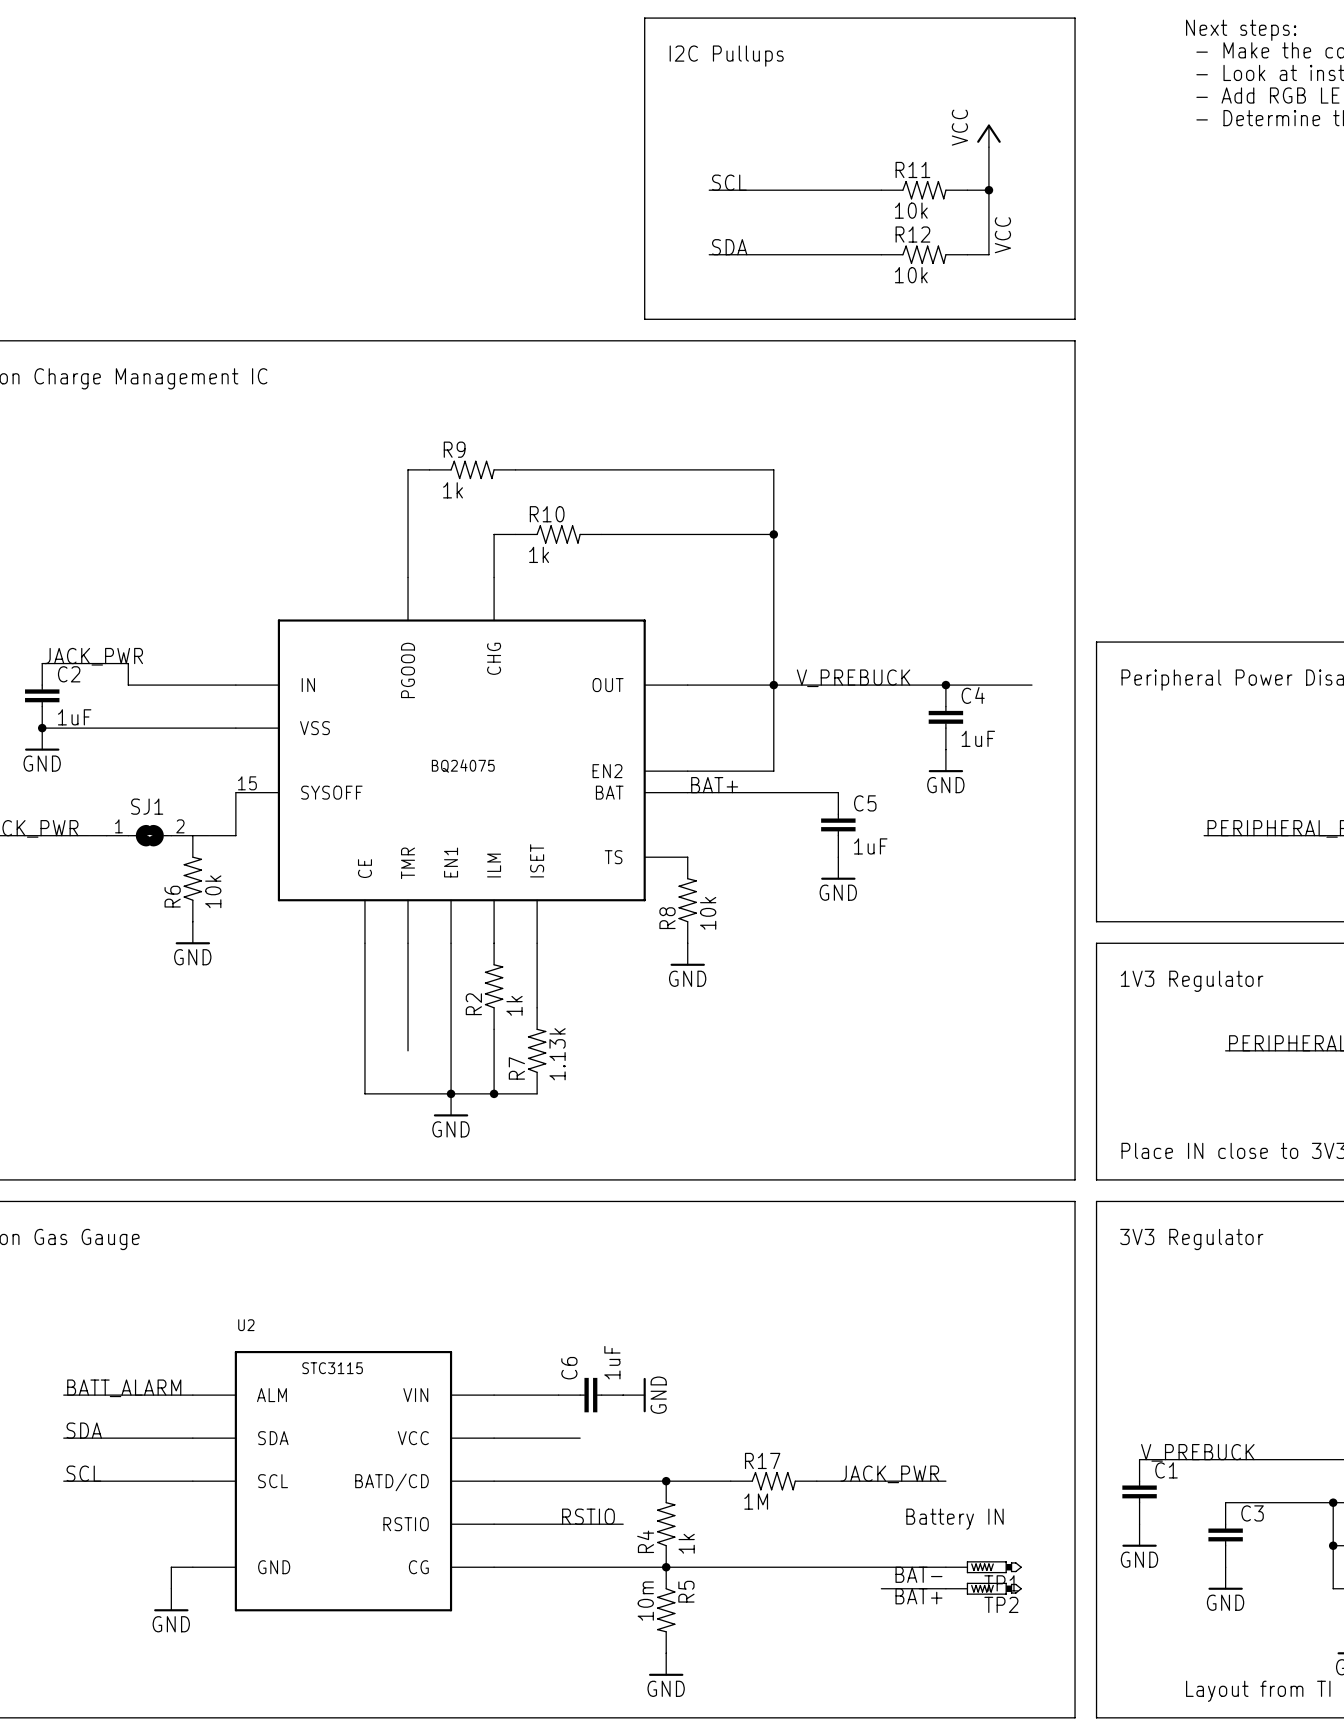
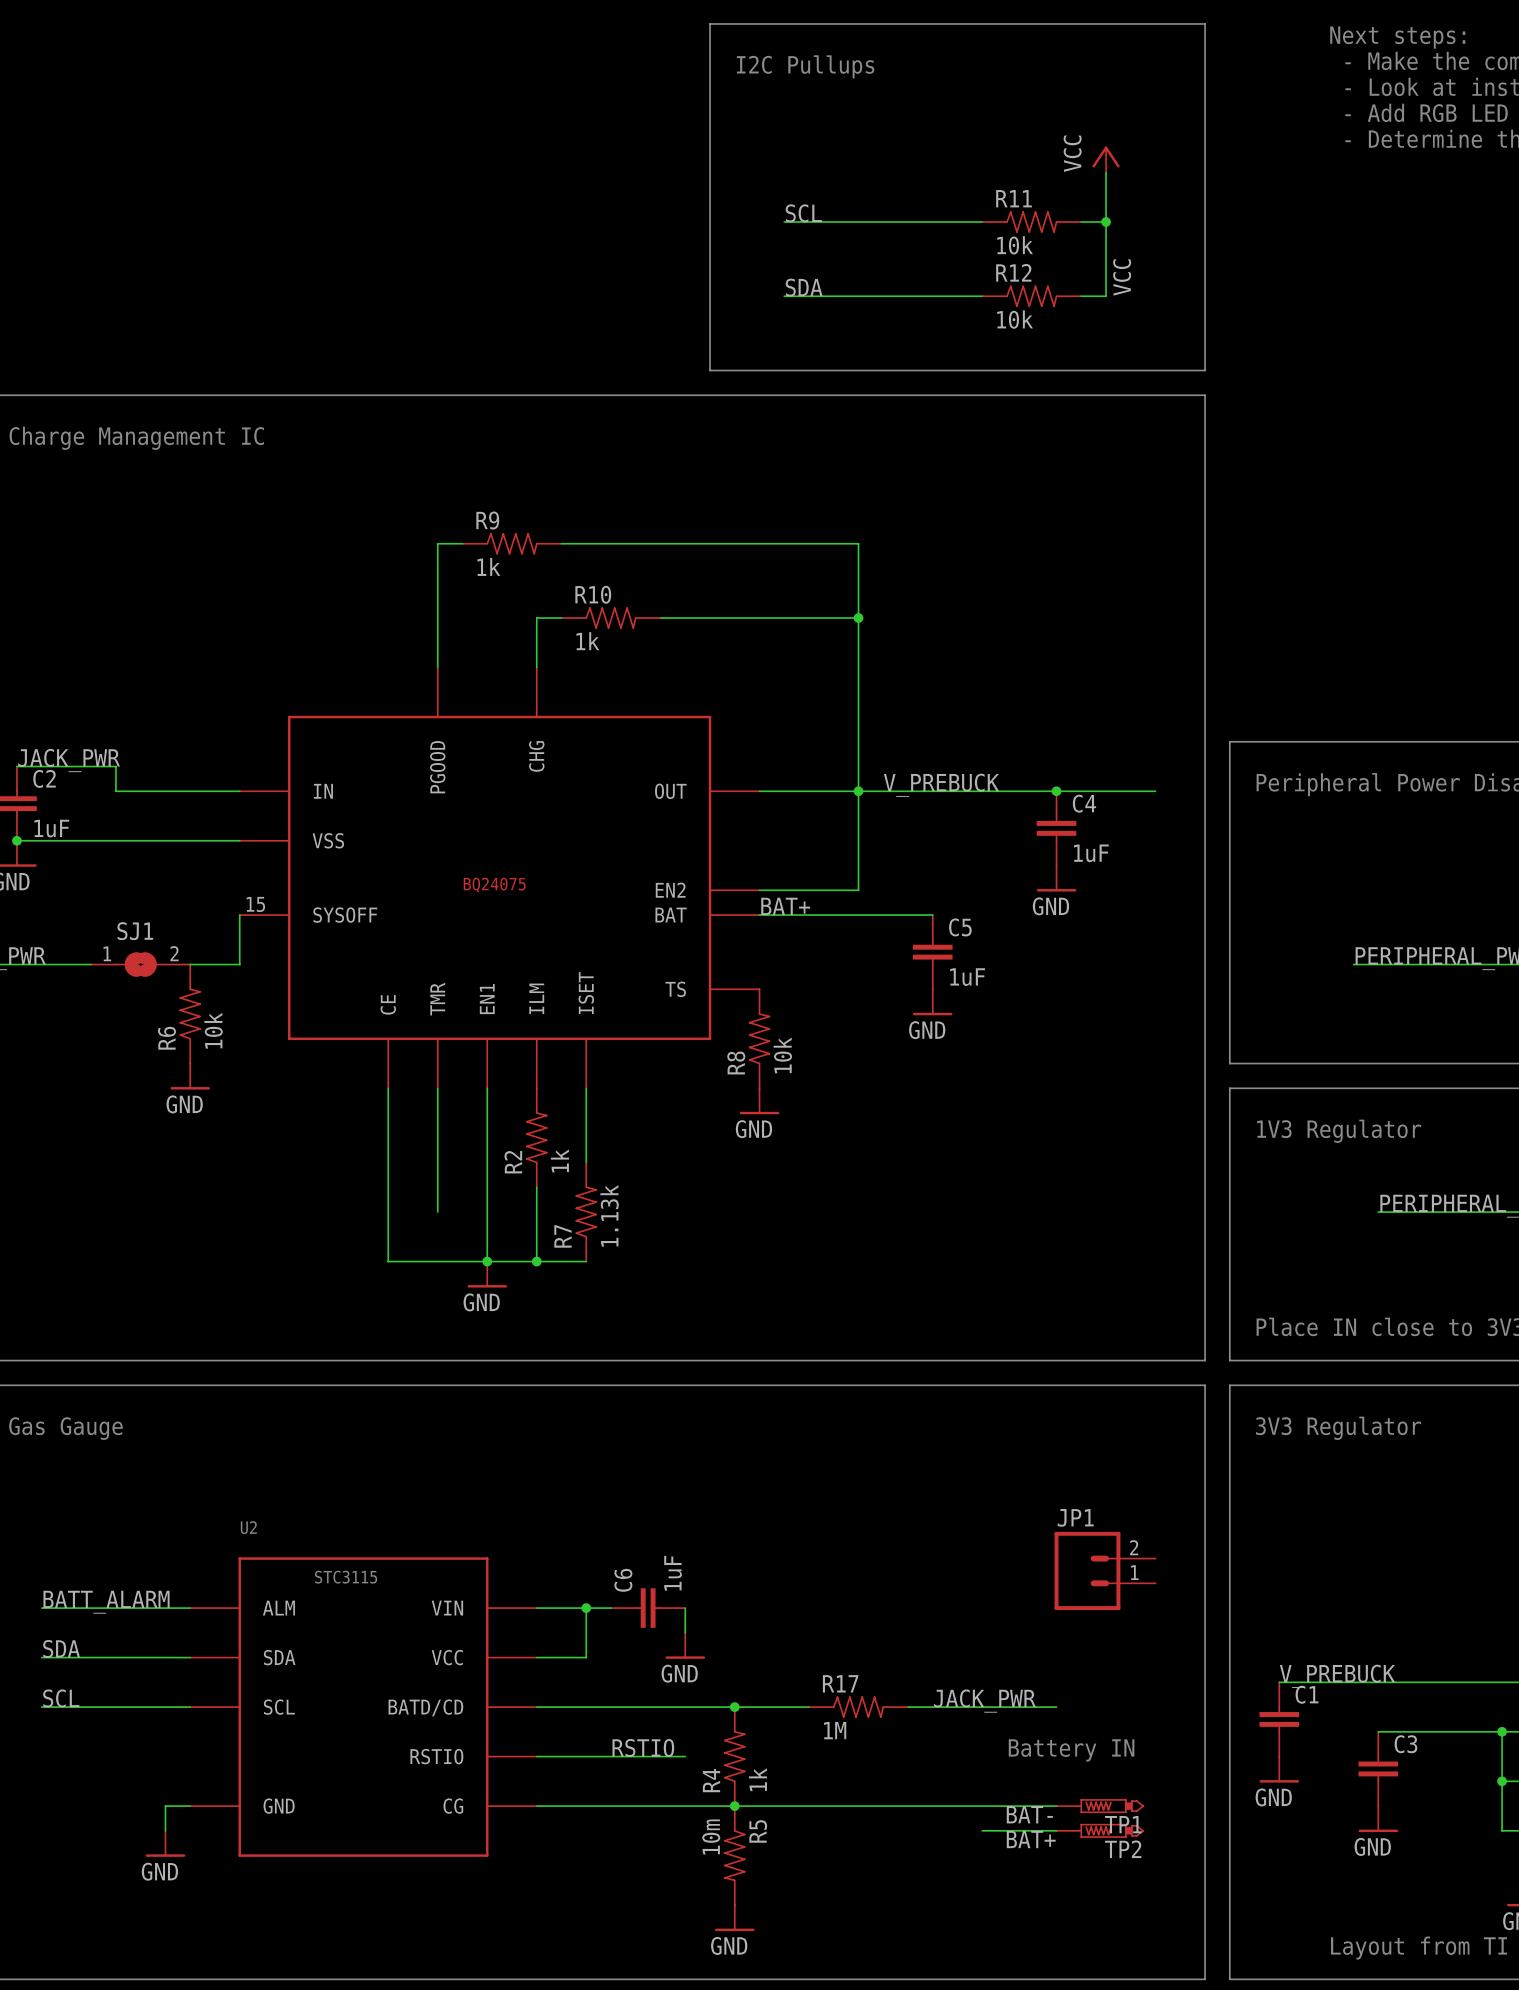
JP1: none -> (1105, 1570)
junction: none -> (586, 1608)
wire: none -> (685, 1608) (685, 1632)
power symbol position: GND (634, 1395) -> GND (685, 1645)
power symbol rotation: 0° (644, 1395) -> 90° clockwise (685, 1657)
wire: (537, 1438) (580, 1438) -> (586, 1657) (586, 1608)

